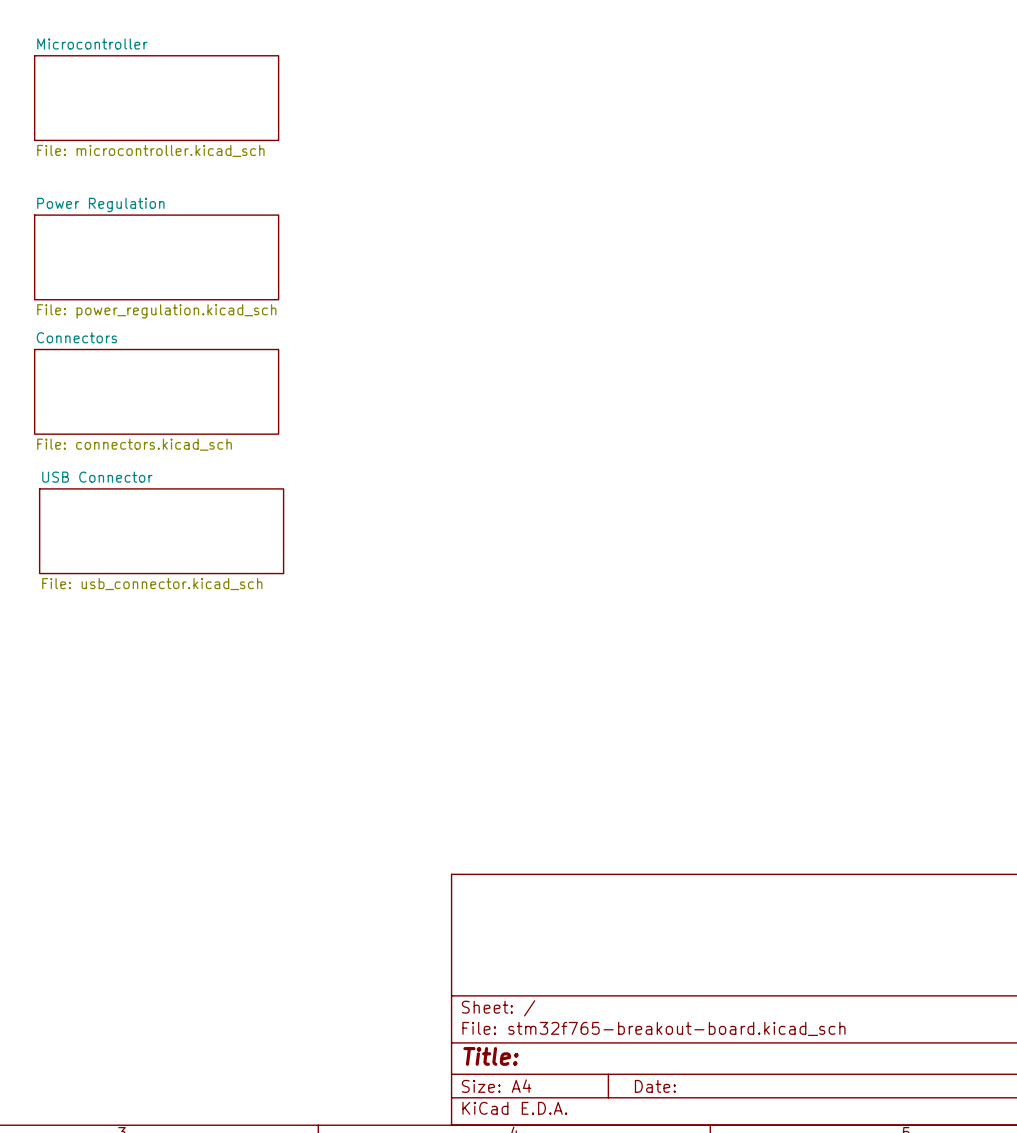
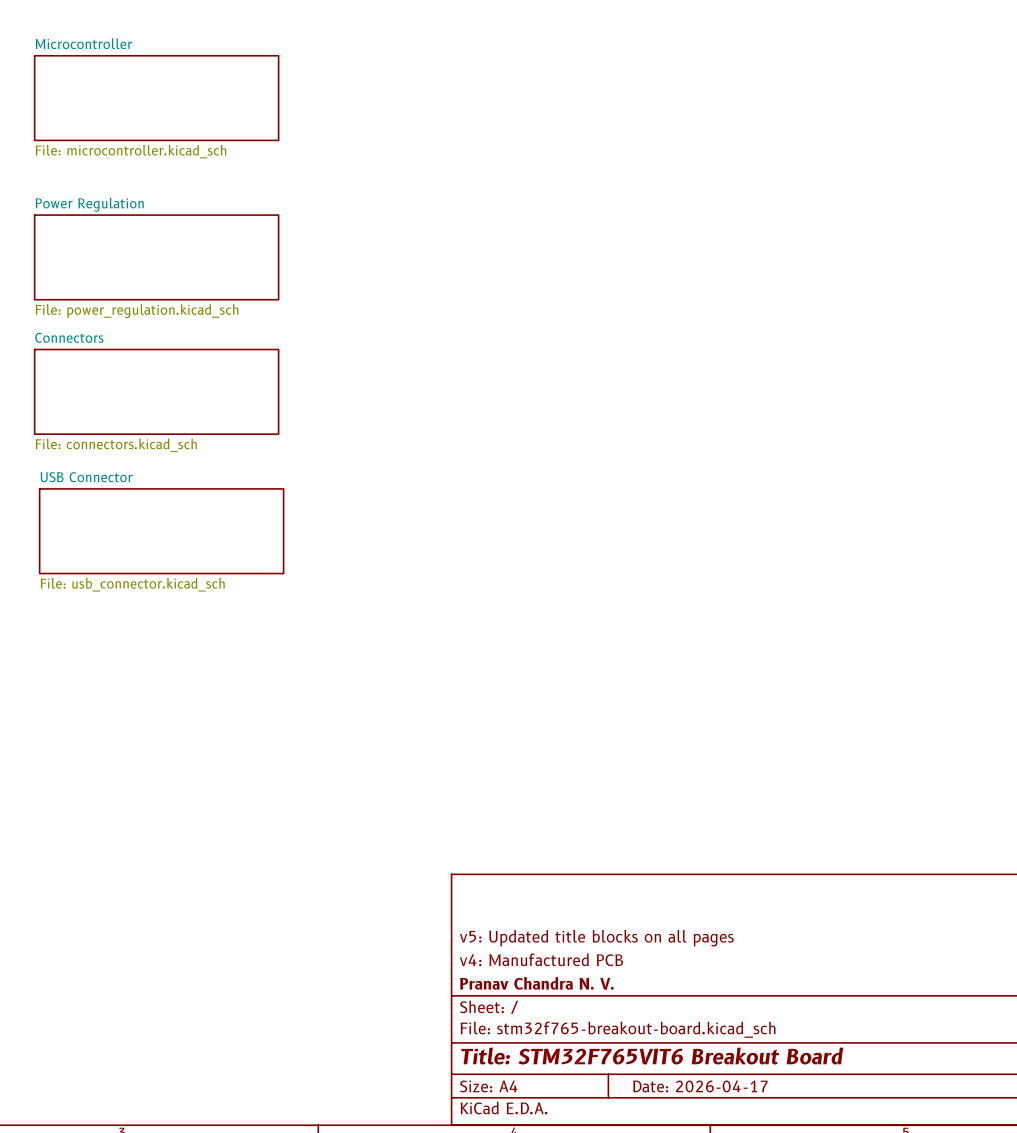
title block: none -> v5: Updated title blocks on all pages (596, 938)
title block: none -> v4: Manufactured PCB (541, 959)
title block: none -> Pranav Chandra N. V. (536, 983)
title block: Title: (491, 1056) -> Title: STM32F765VIT6 Breakout Board (652, 1056)
title block: Date: (655, 1086) -> Date: 2026-04-17 (700, 1086)

